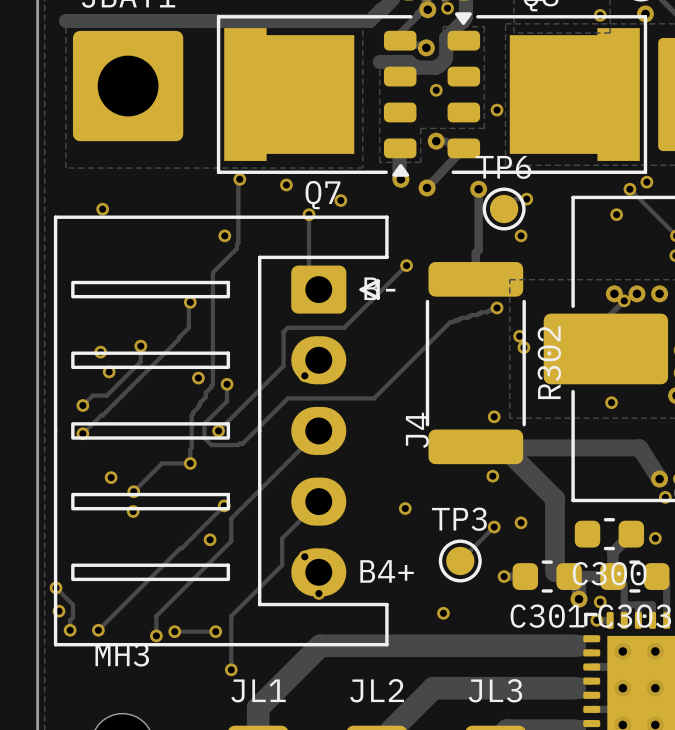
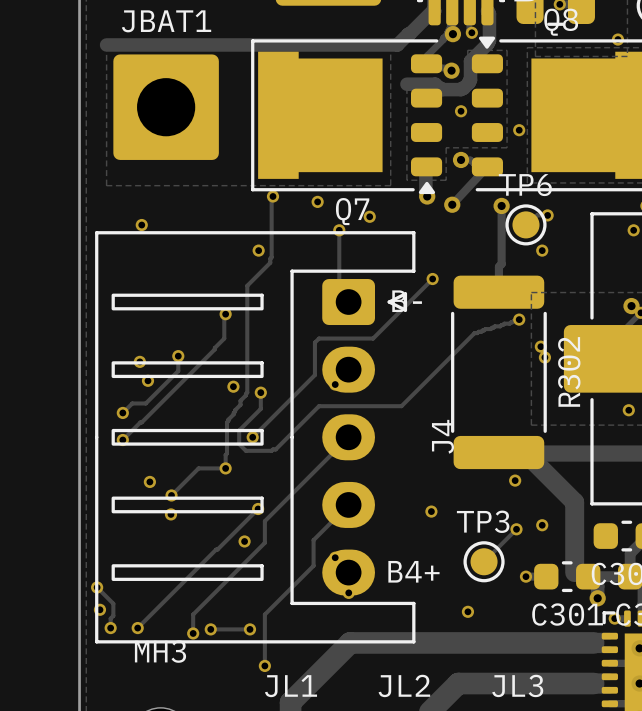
via: (494, 416) -> none
via: (600, 601) -> none

